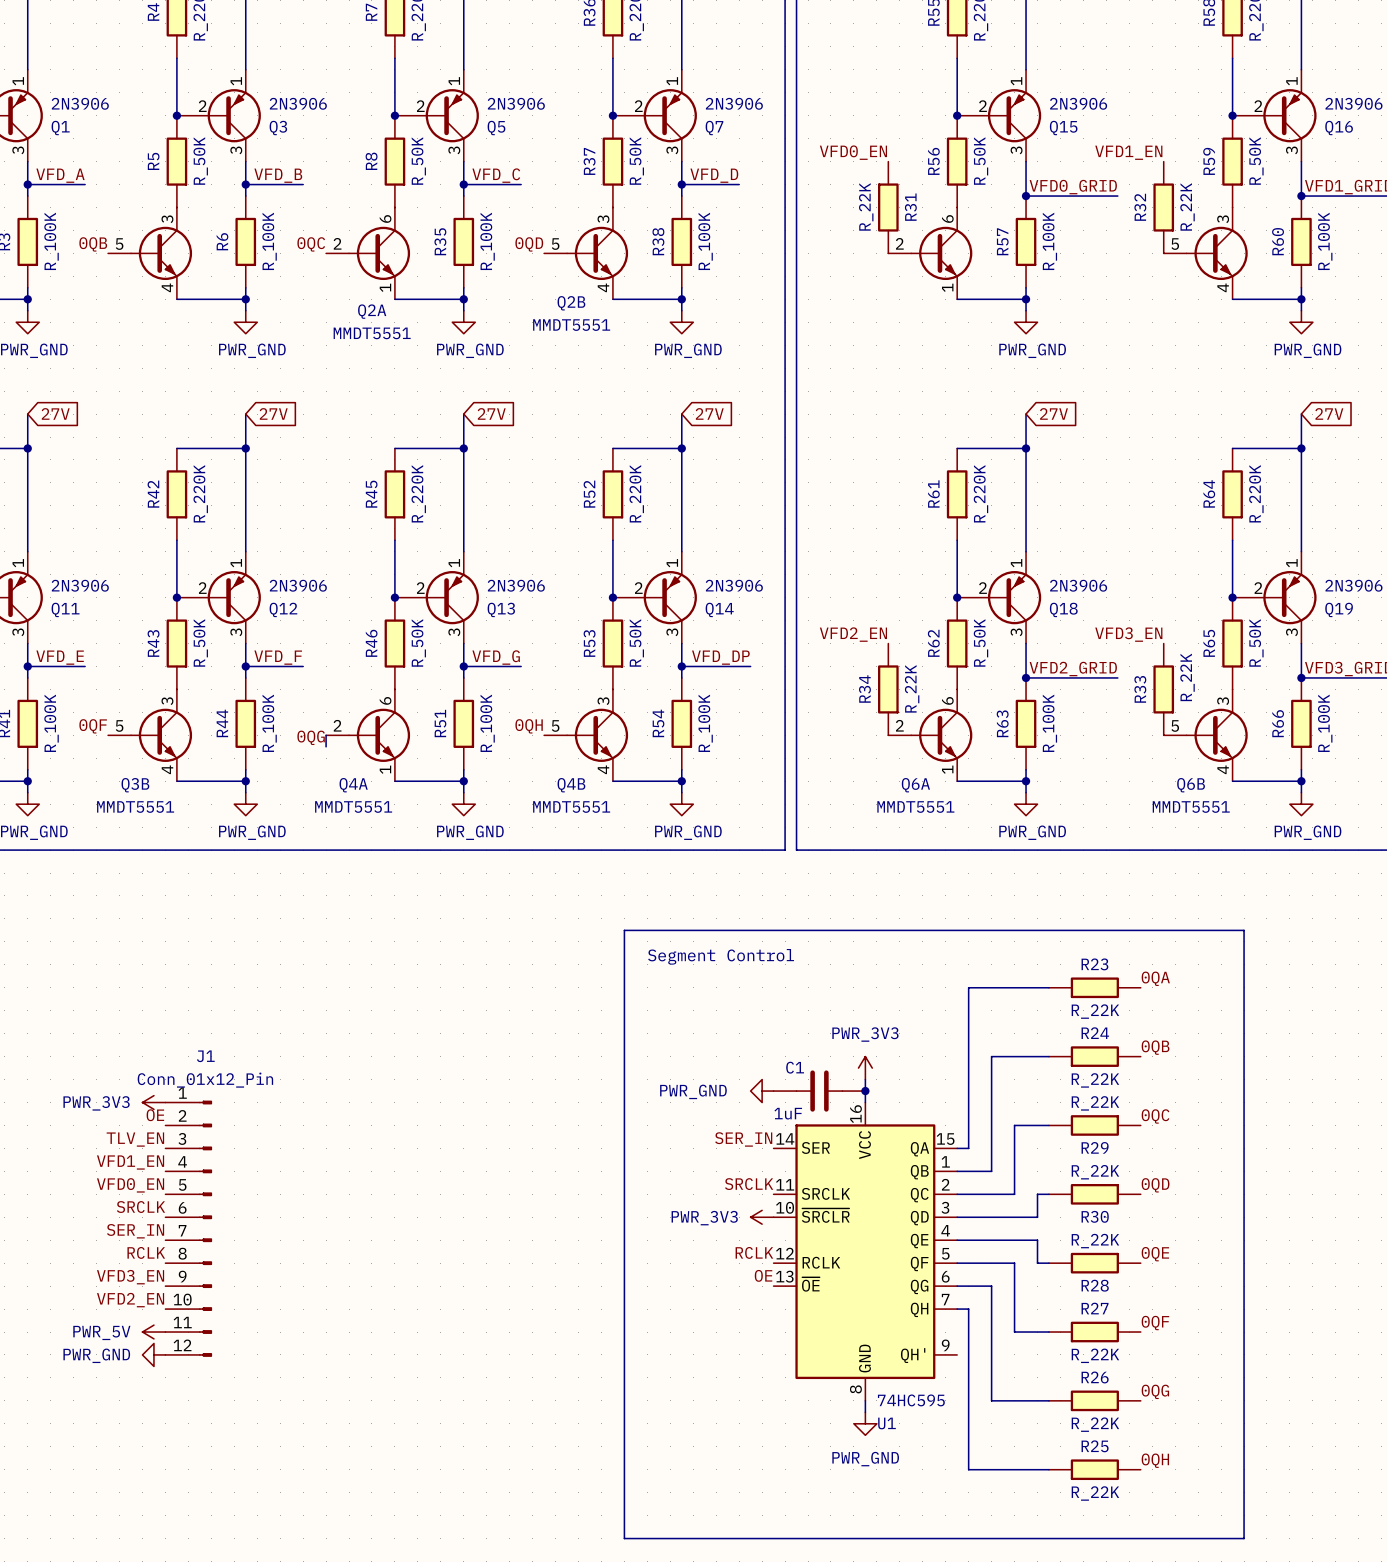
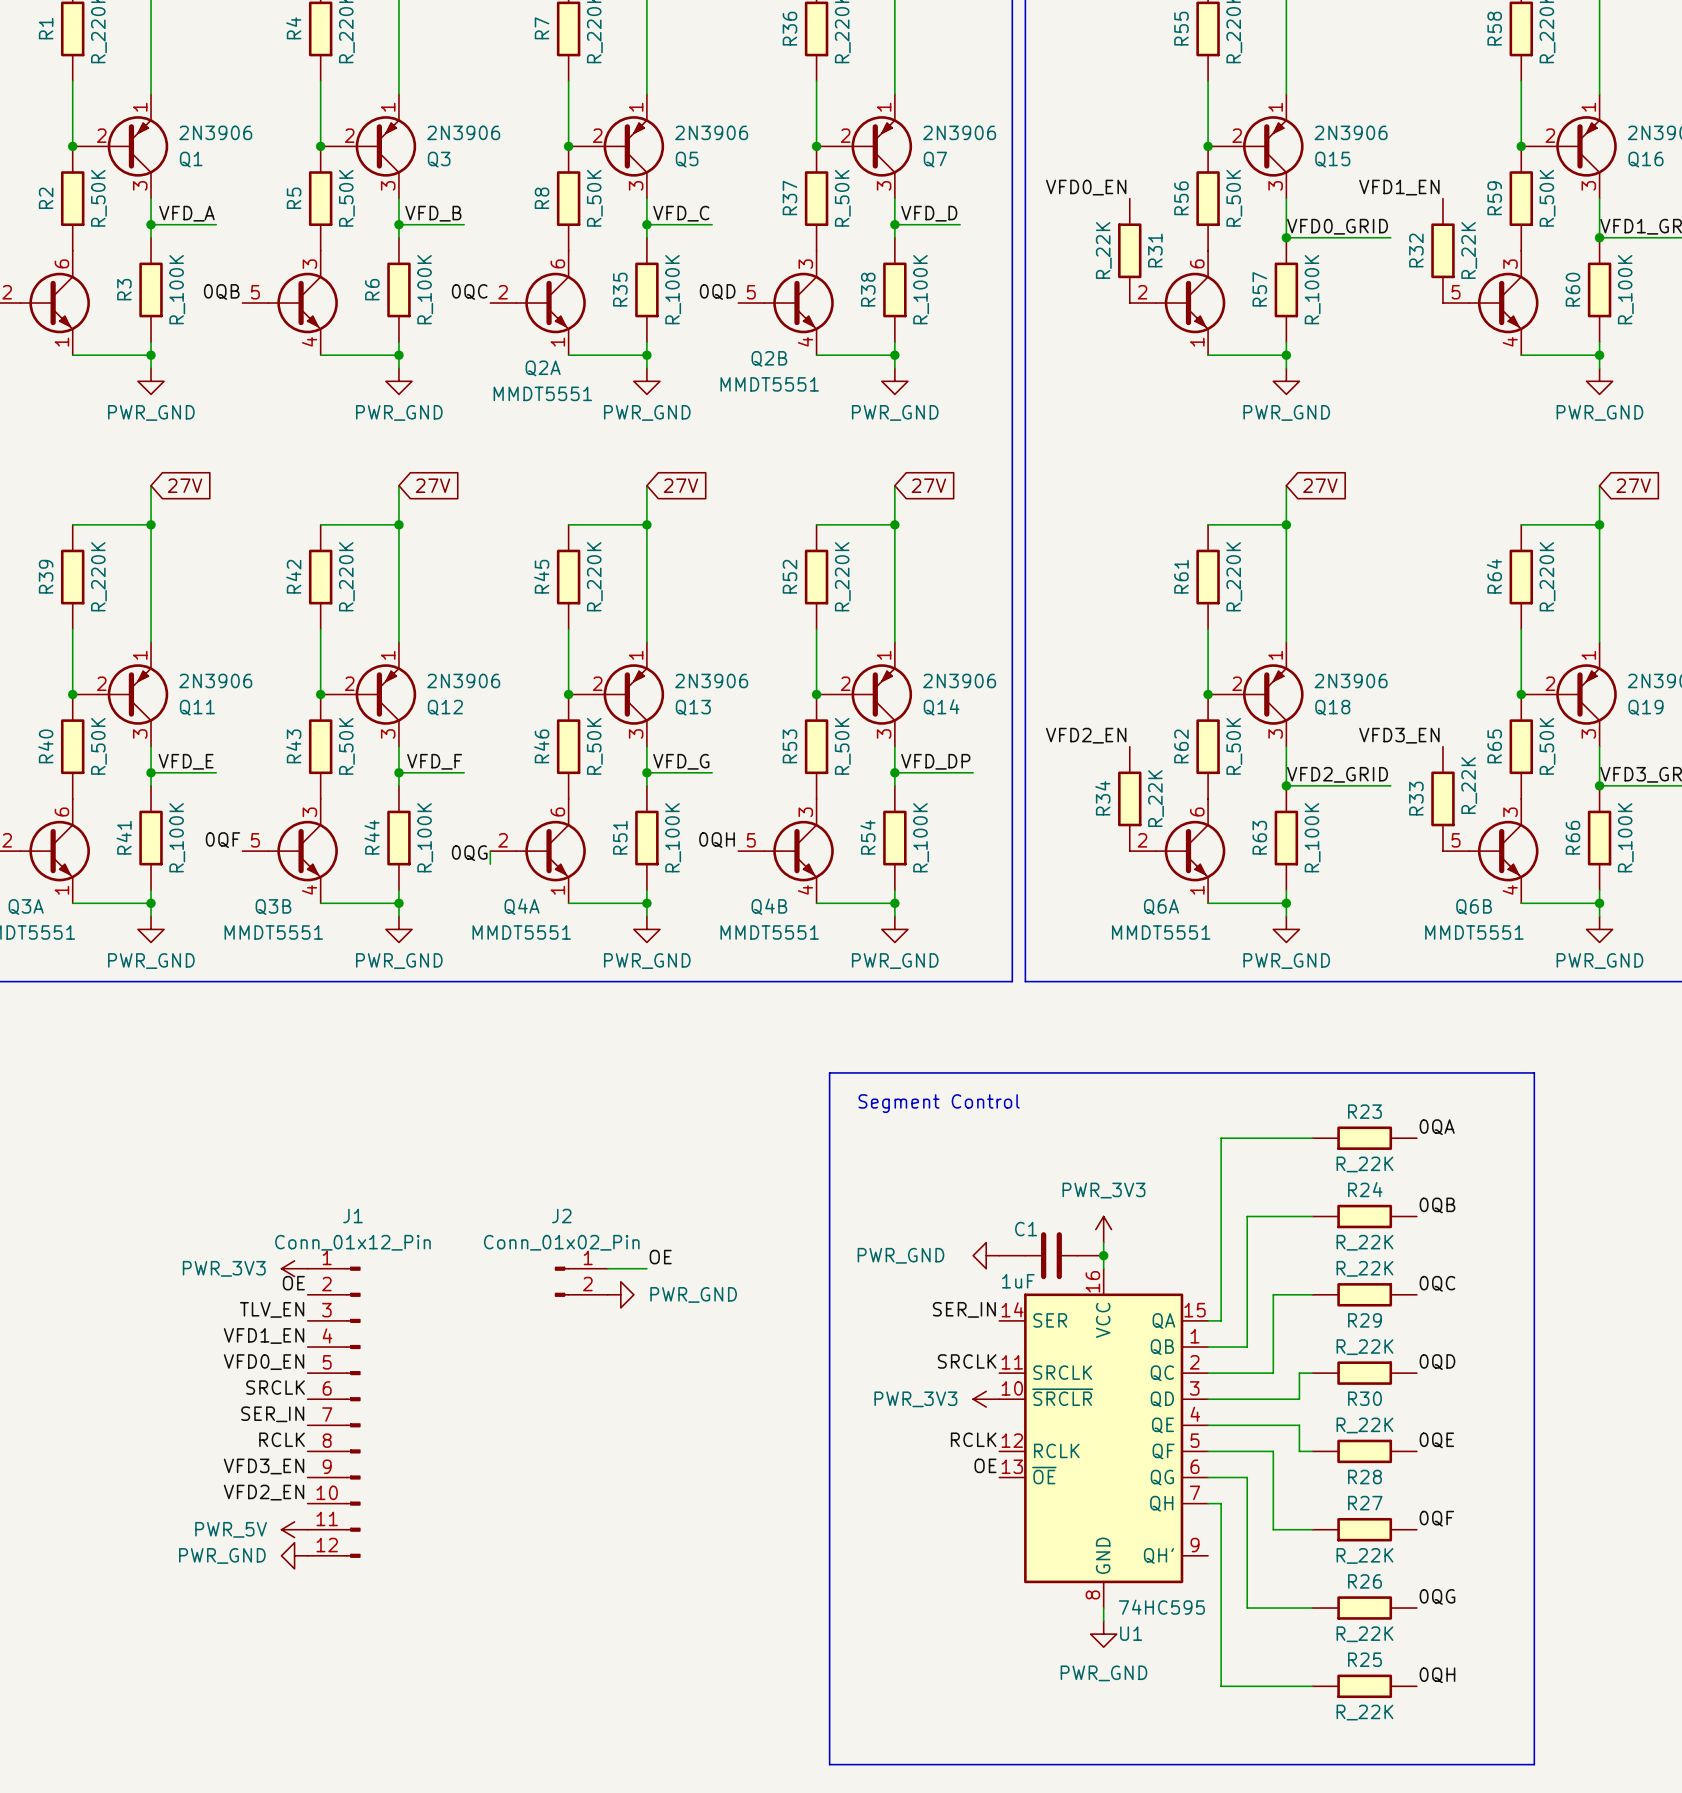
label: none -> OE (660, 1257)
wire: none -> (607, 1268) (646, 1268)
J2: none -> Conn_01x02_Pin (581, 1281)
power symbol: none -> PWR_GND (620, 1294)

